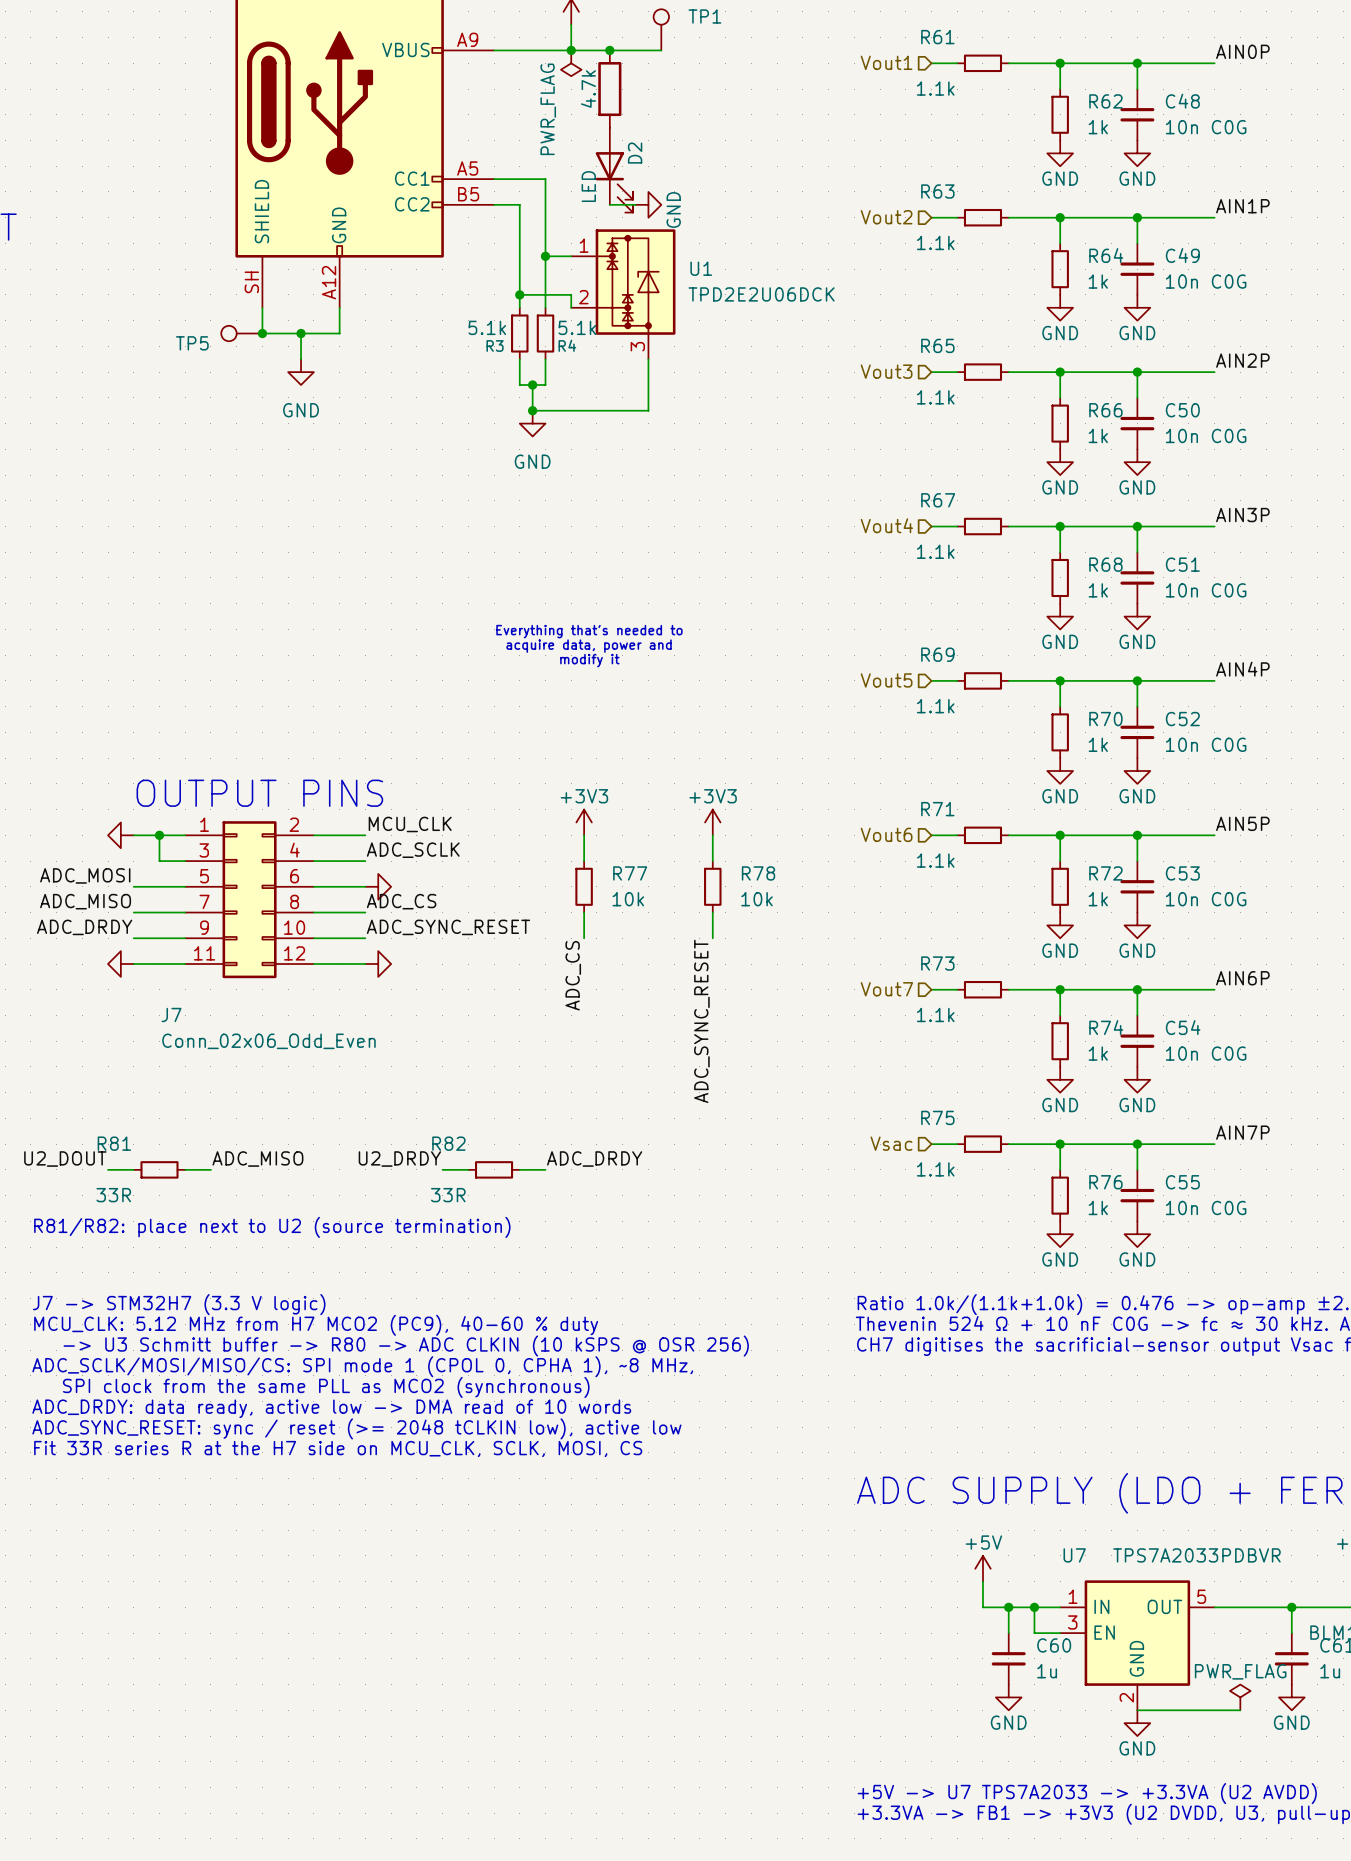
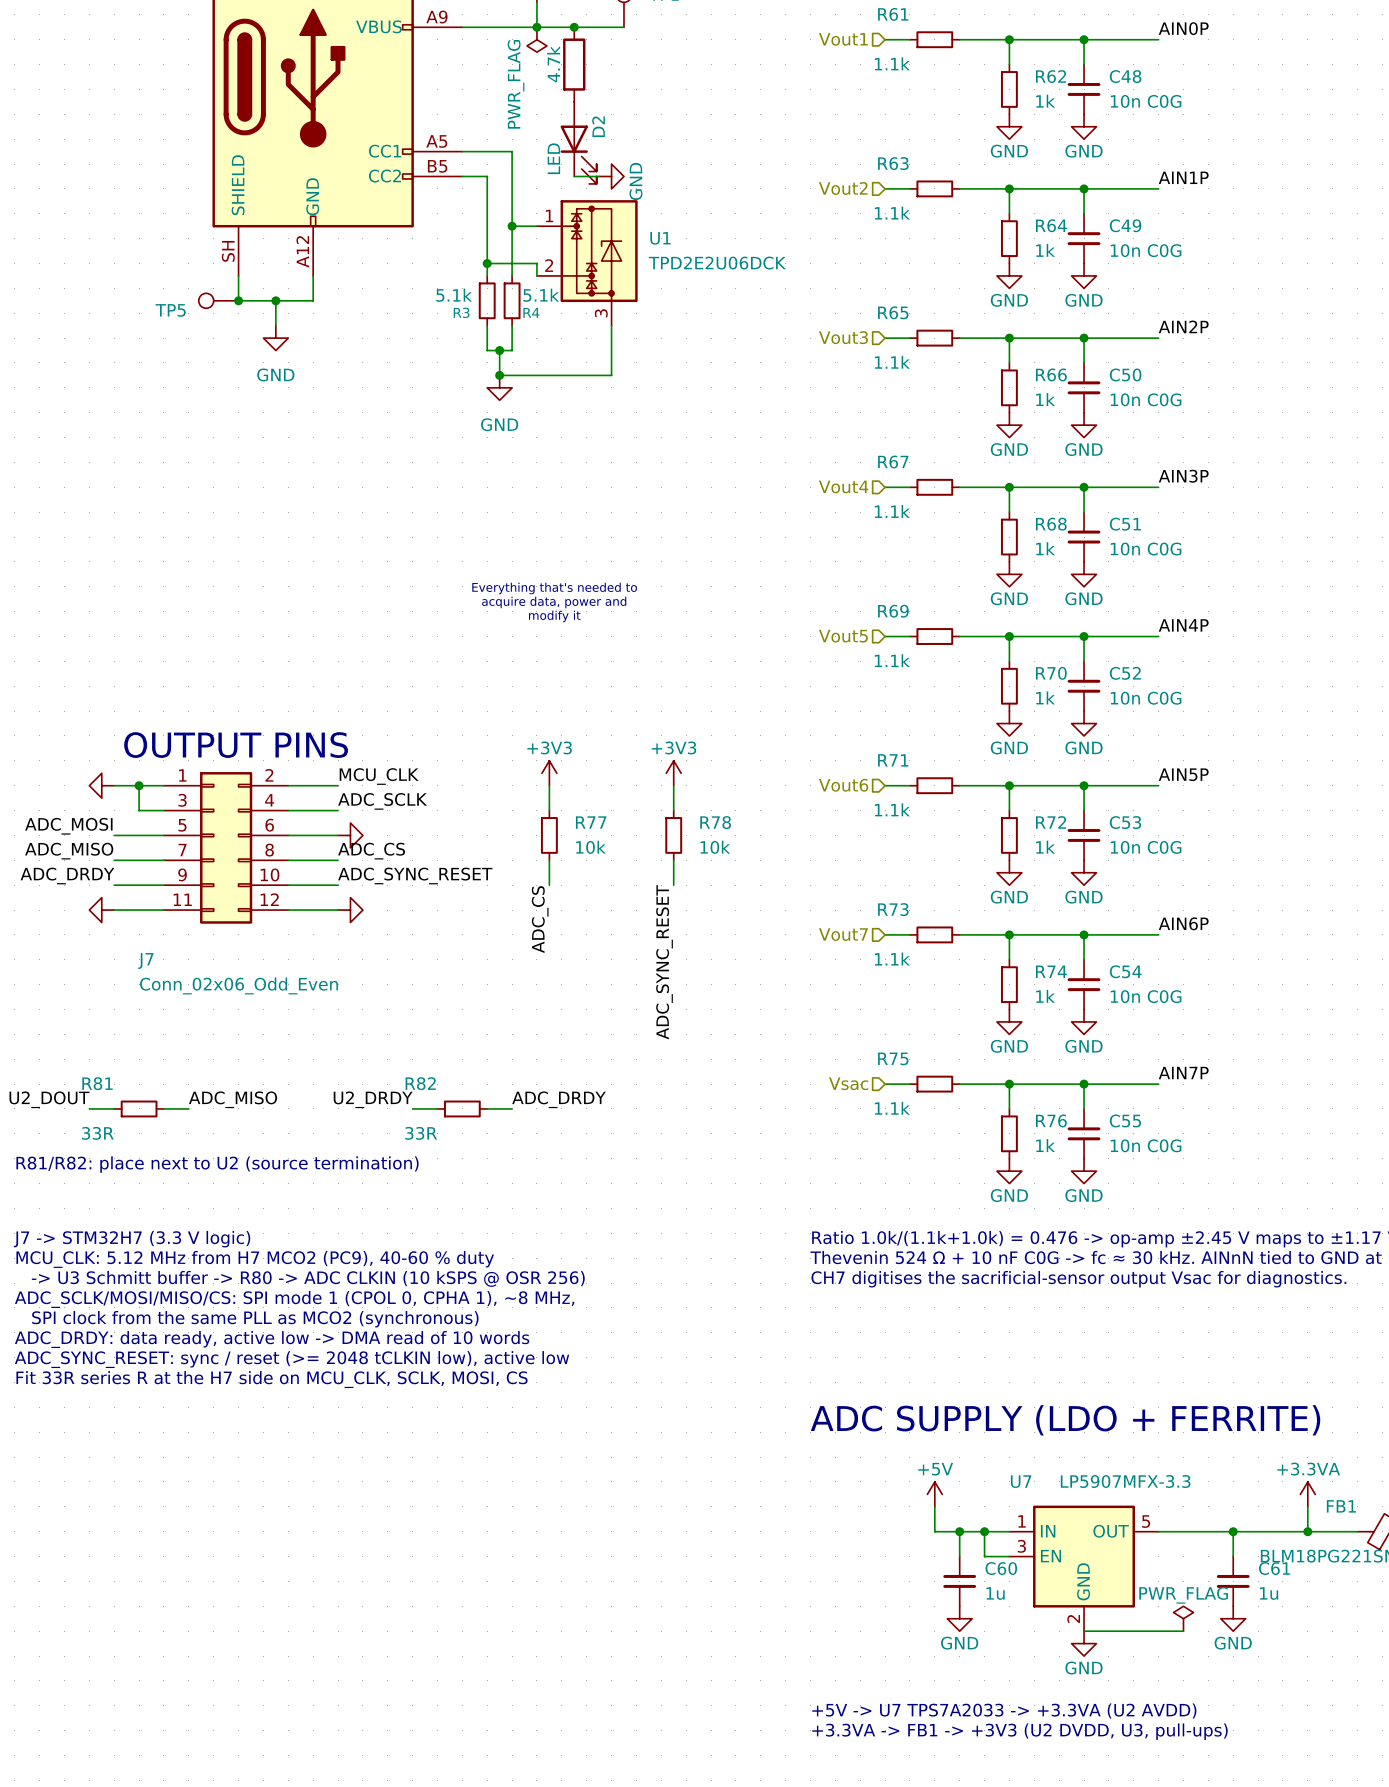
U7 value: TPS7A2033PDBVR (1196, 1555) -> LP5907MFX-3.3 (1125, 1481)

